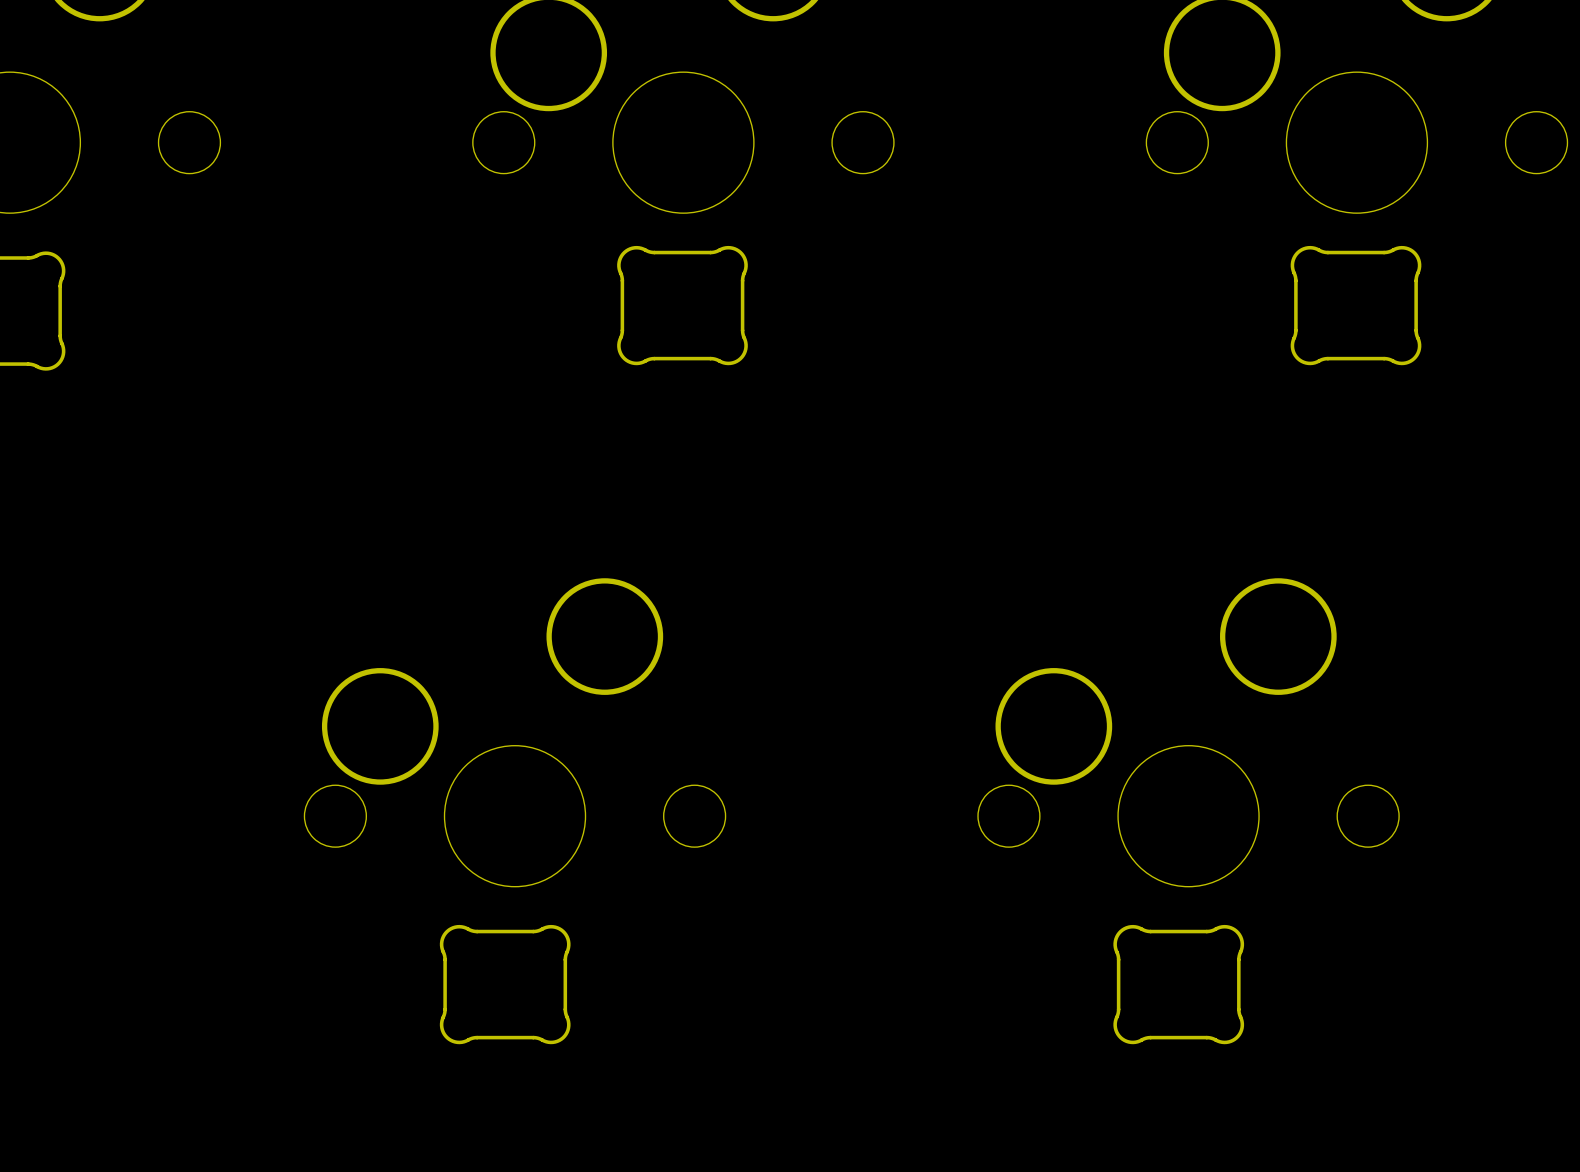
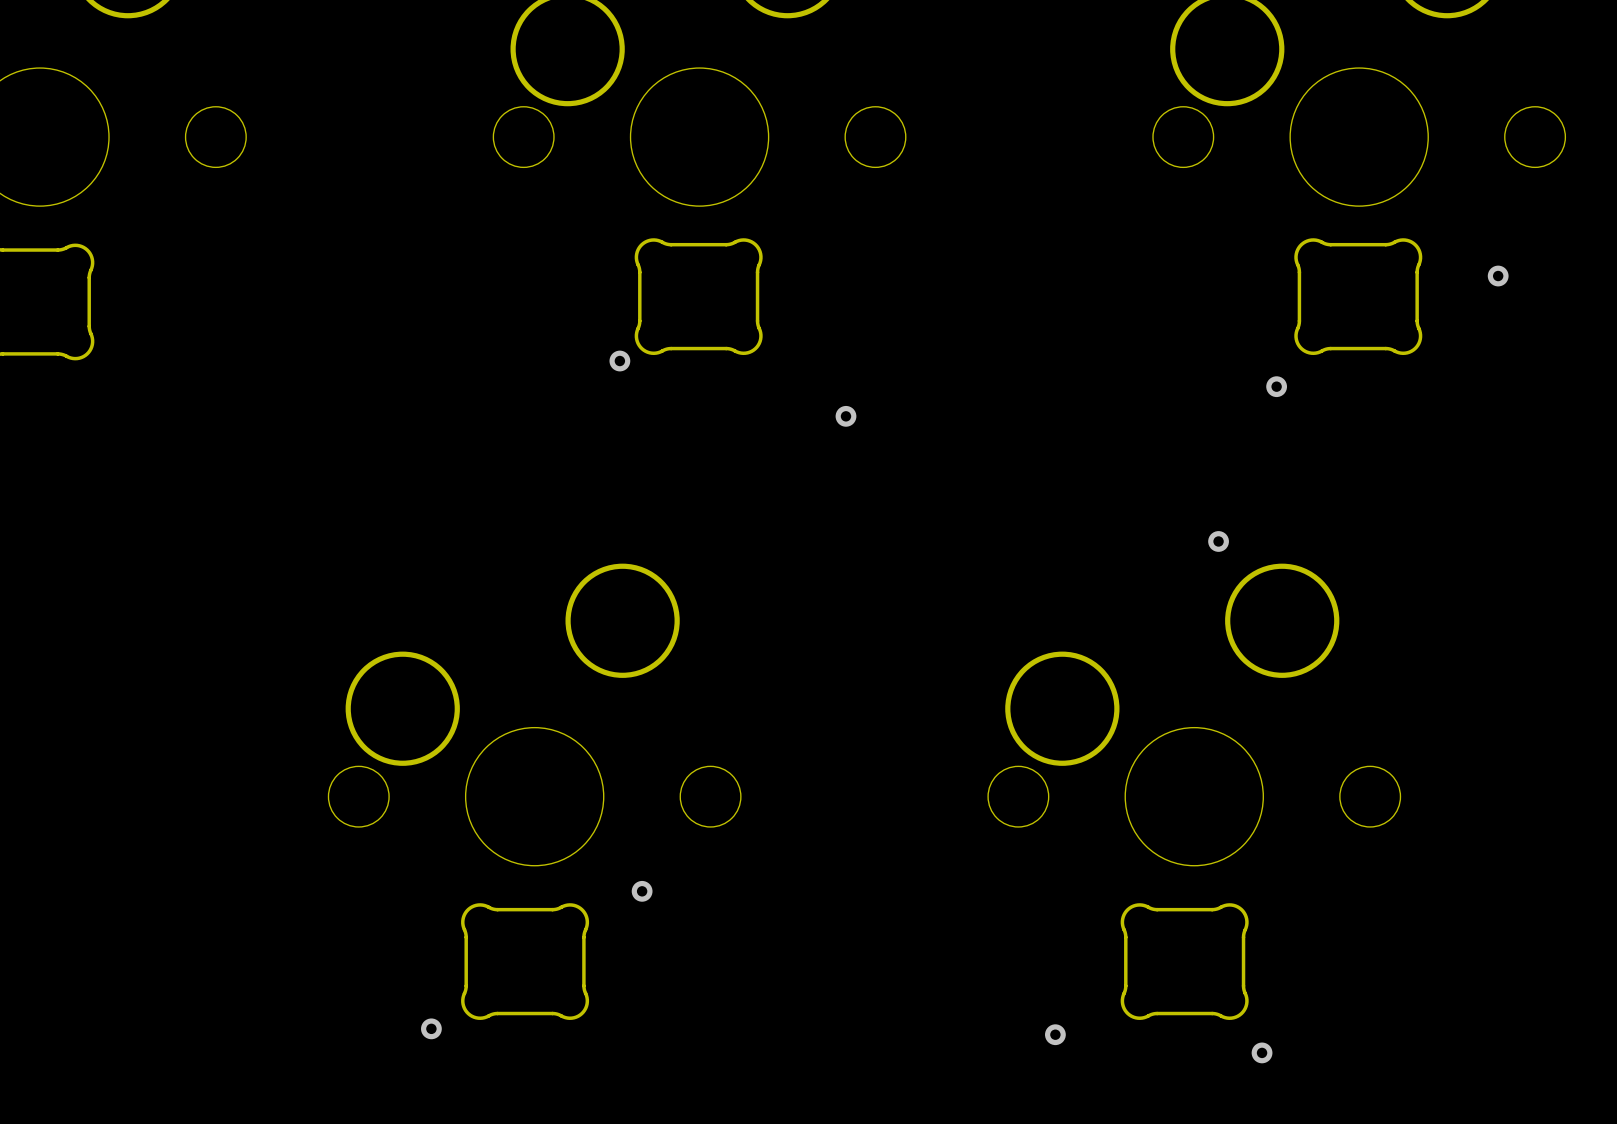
via: none -> (1498, 276)
via: none -> (619, 361)
via: none -> (1276, 386)
via: none -> (845, 416)
via: none -> (1218, 541)
via: none -> (642, 891)
via: none -> (431, 1028)
via: none -> (1055, 1034)
via: none -> (1262, 1052)

